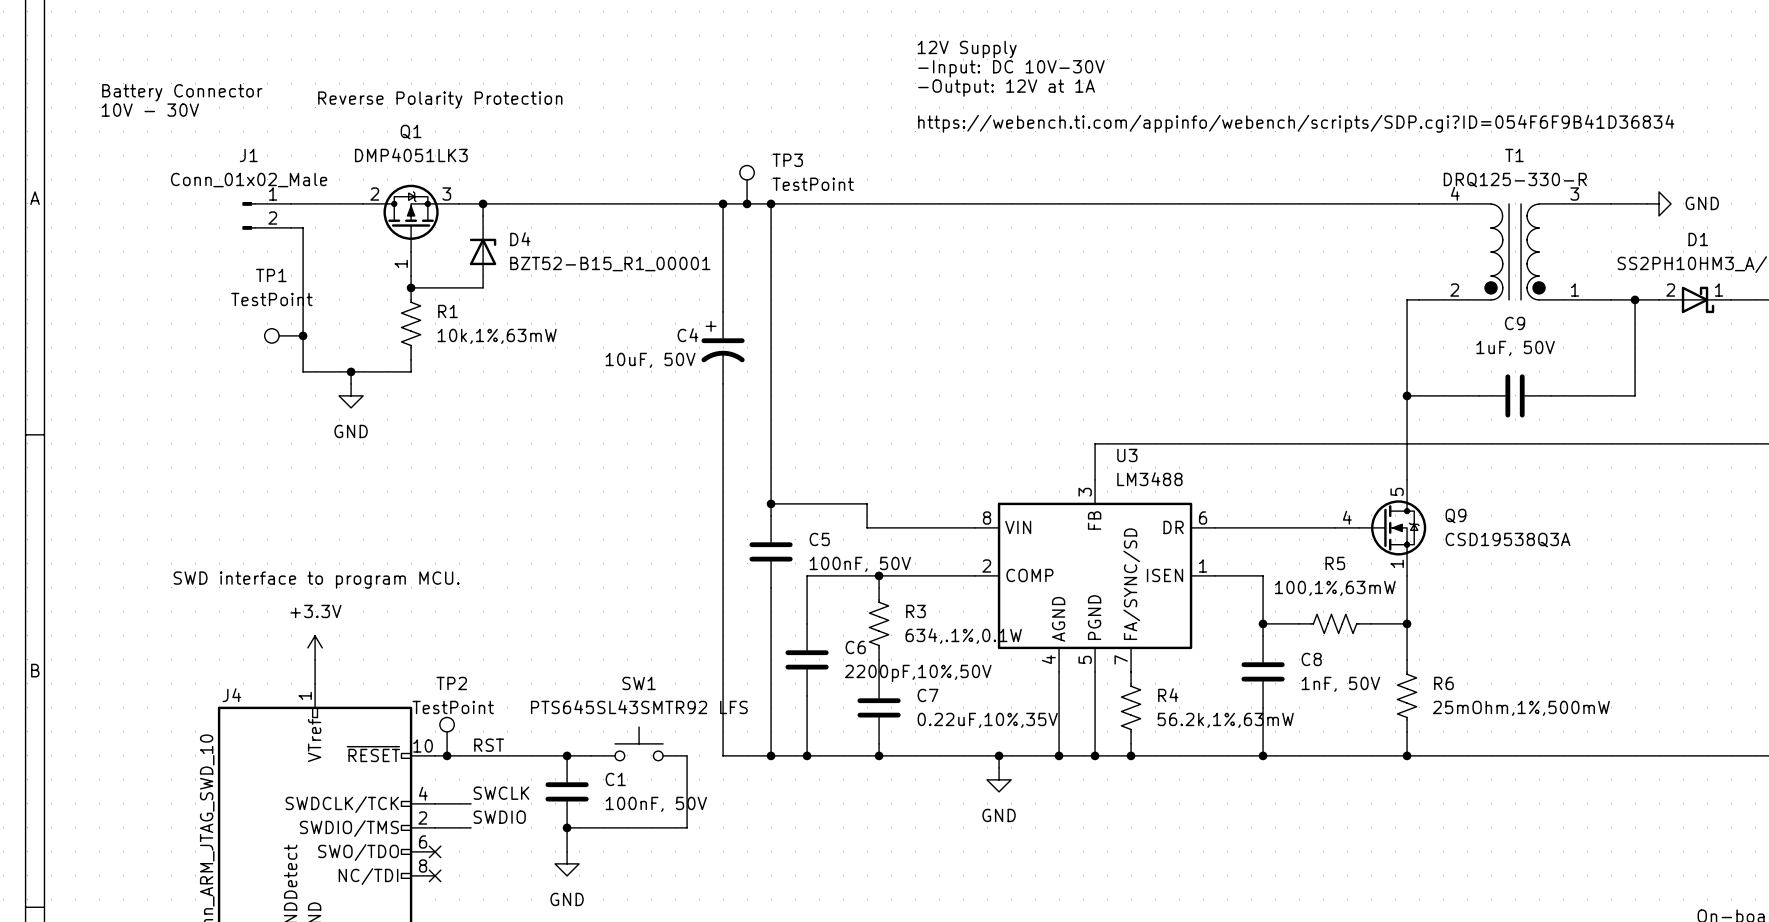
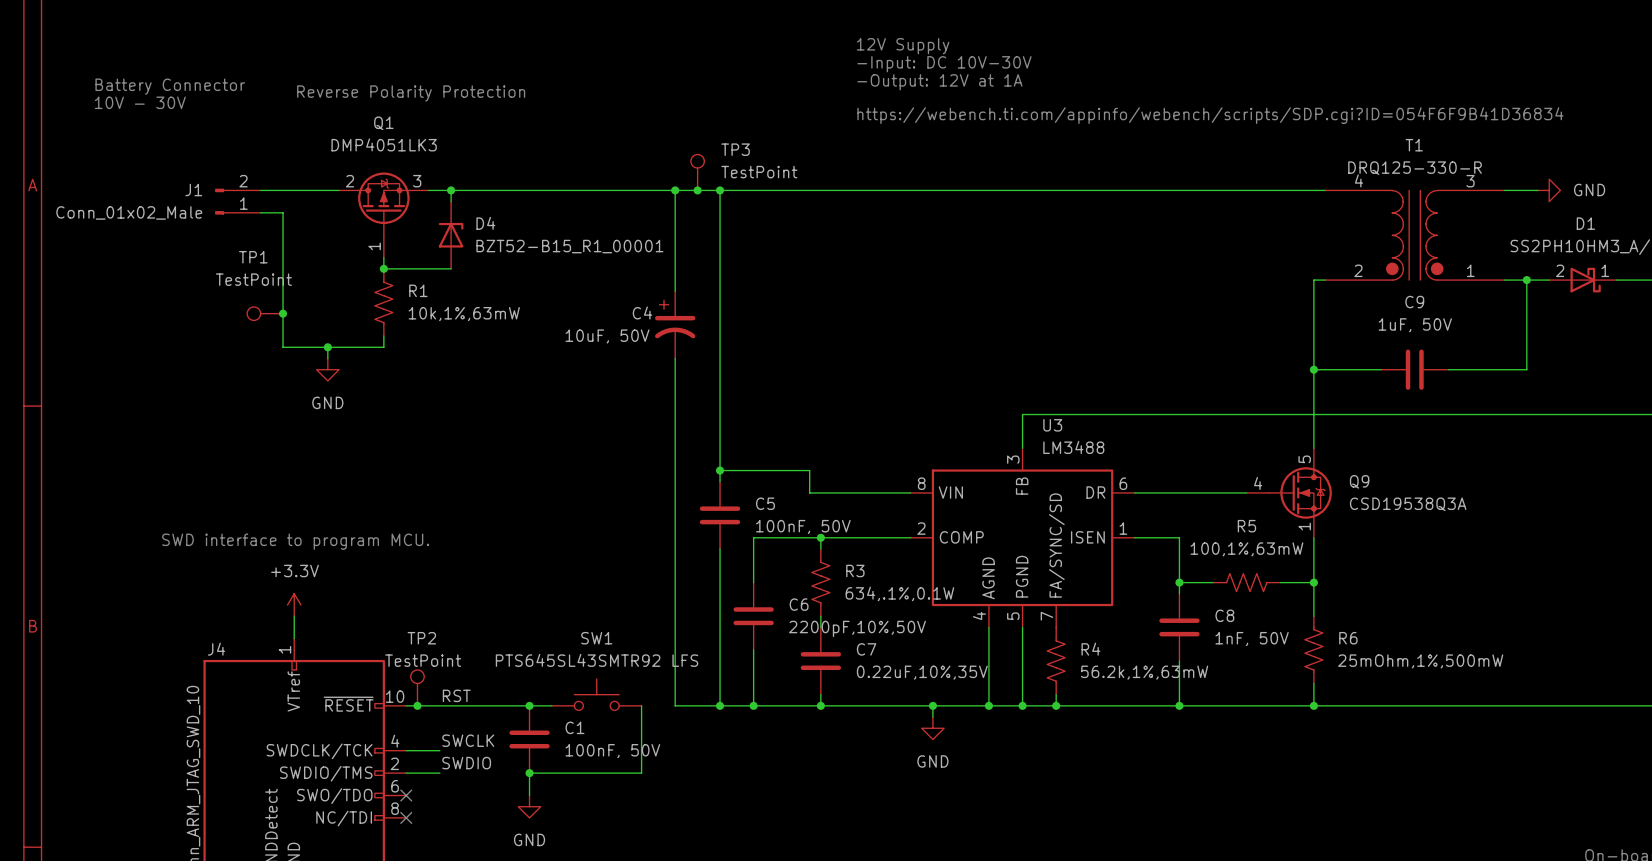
J1 name position: J1 (248, 155) -> J1 (193, 190)
J1 value position: Conn_01x02_Male (249, 180) -> Conn_01x02_Male (129, 212)
J1 flip: as is (249, 215) -> up-down (221, 201)

